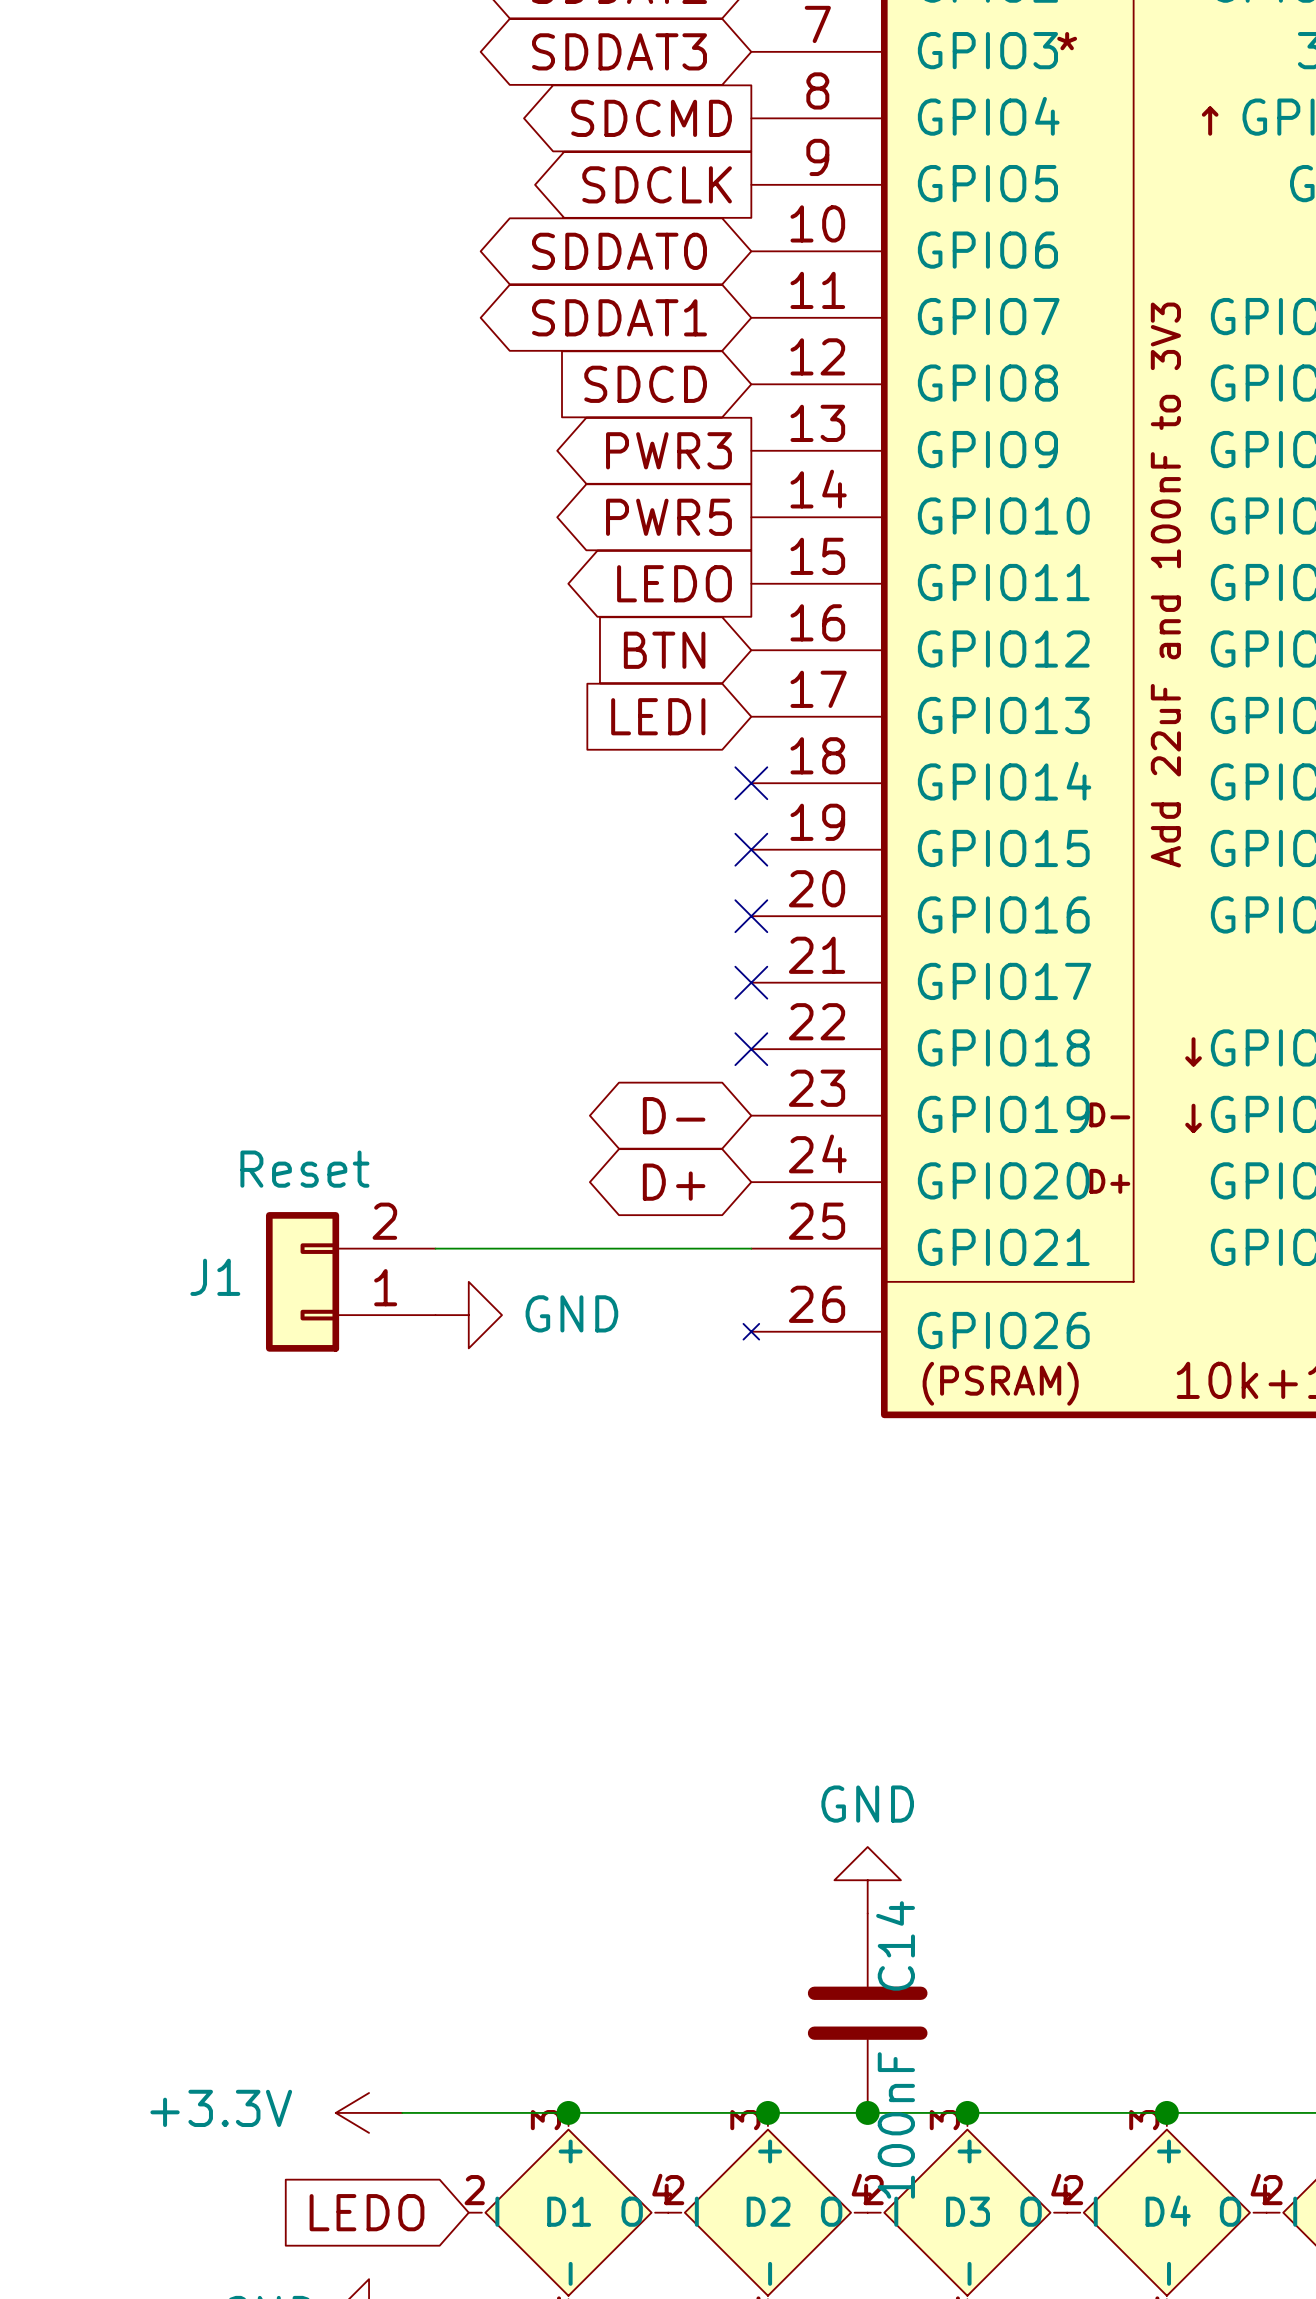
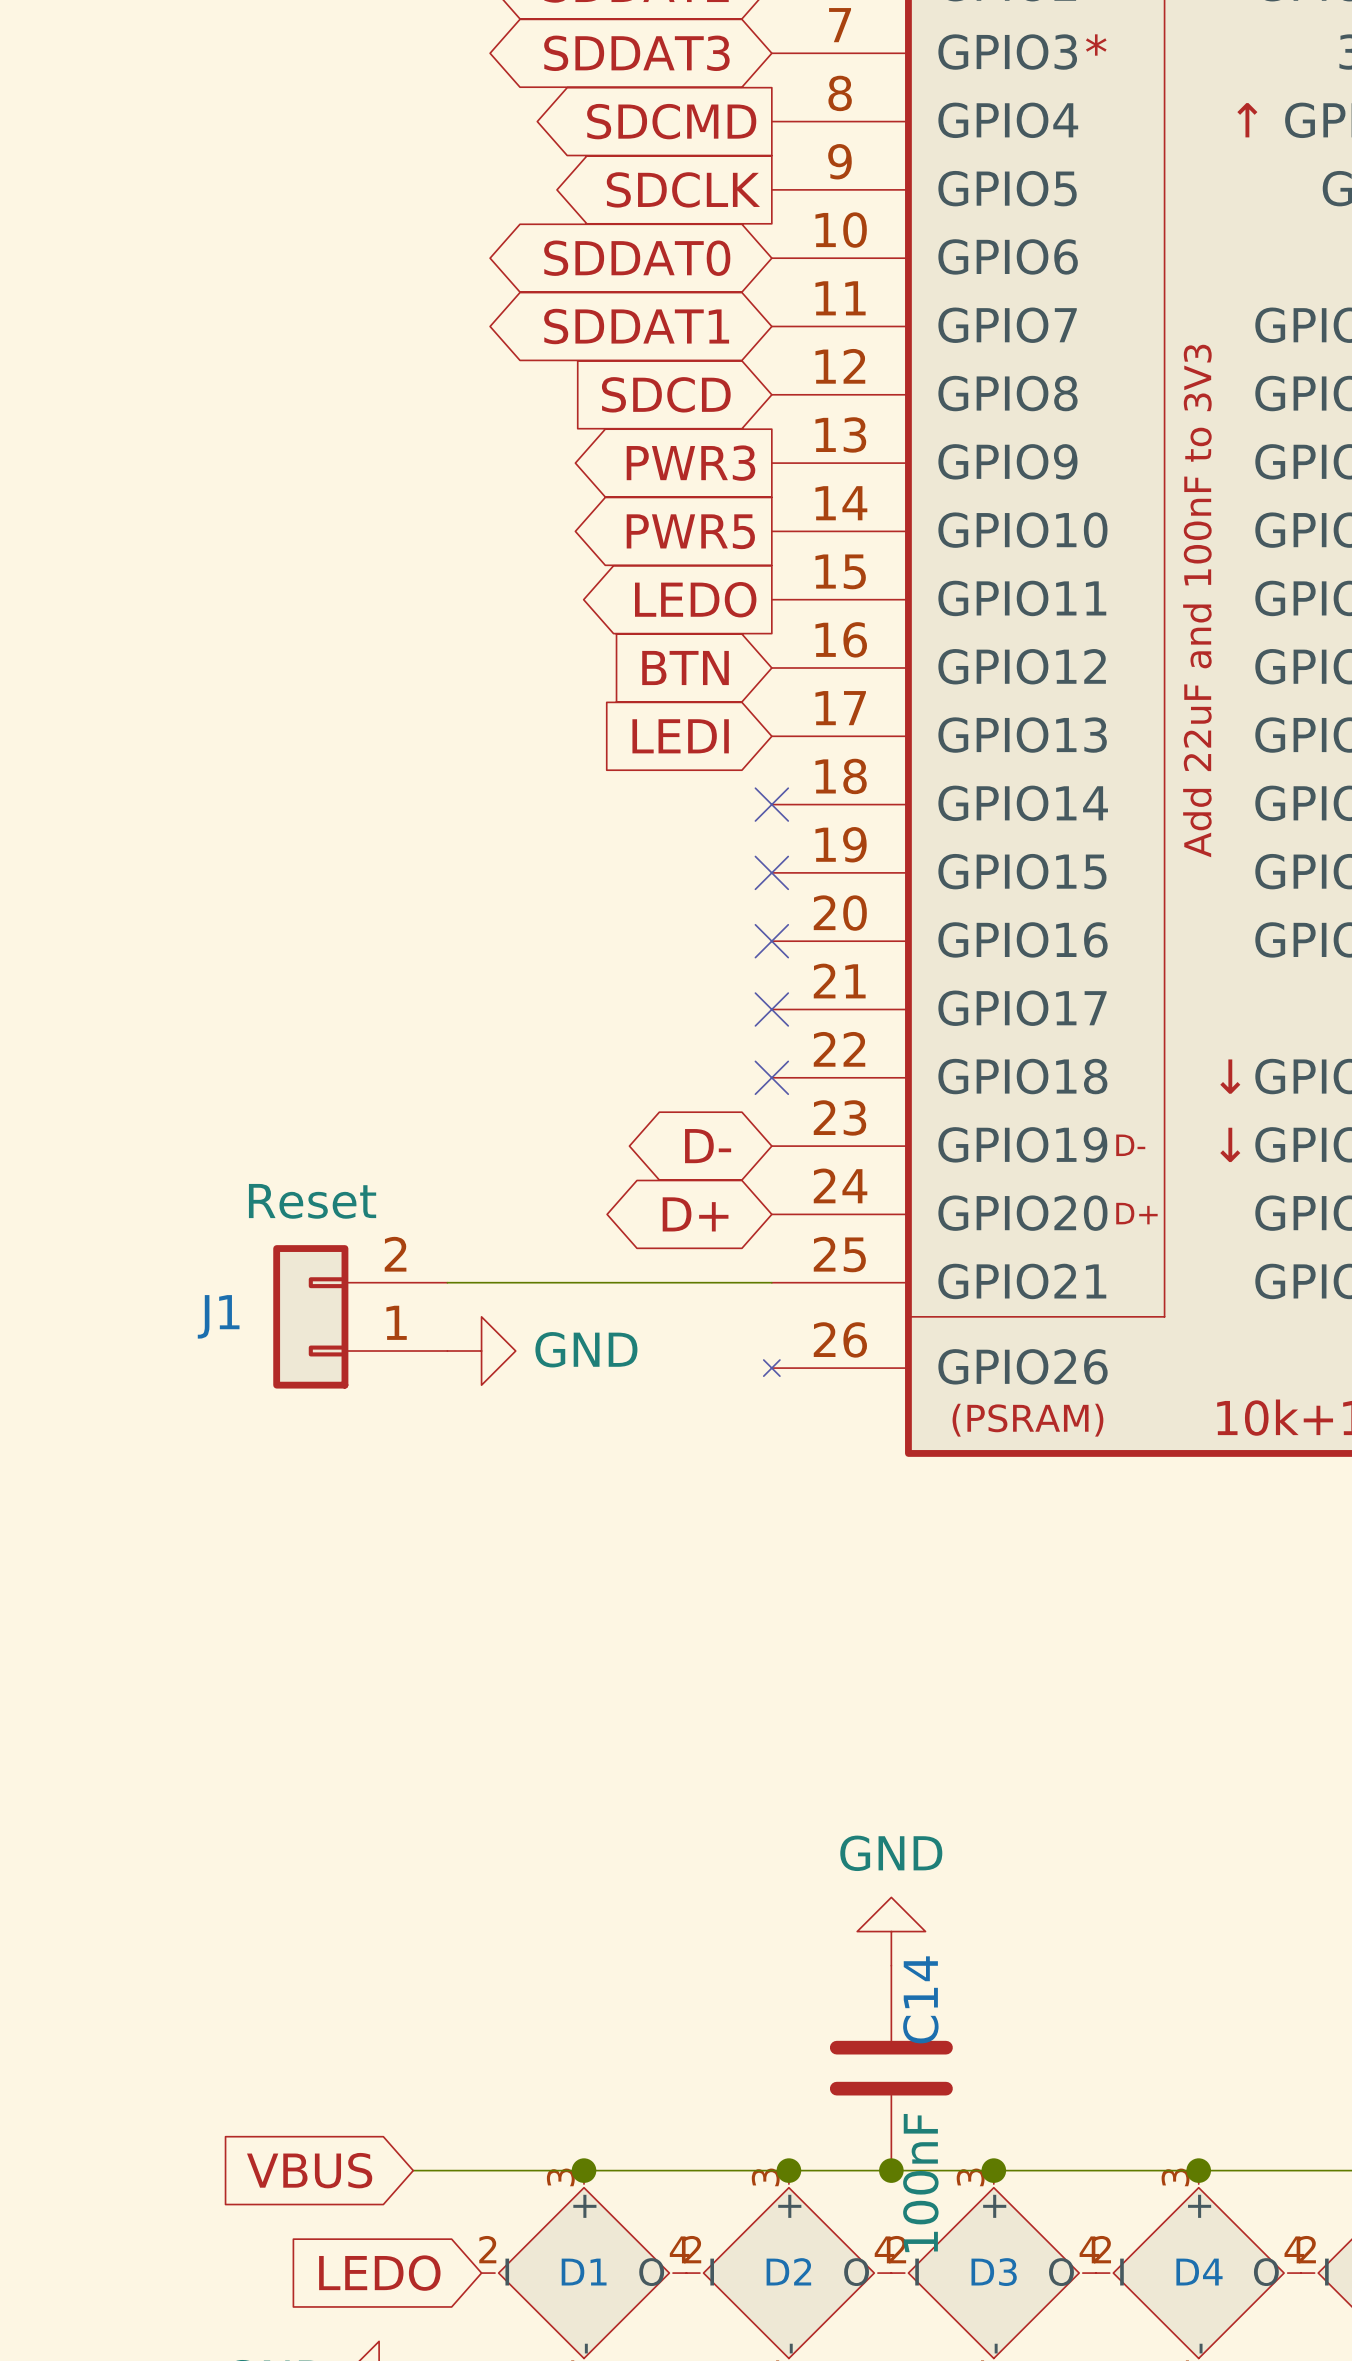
global label: none -> VBUS (309, 2170)
power symbol: +3.3V (369, 2112) -> none

